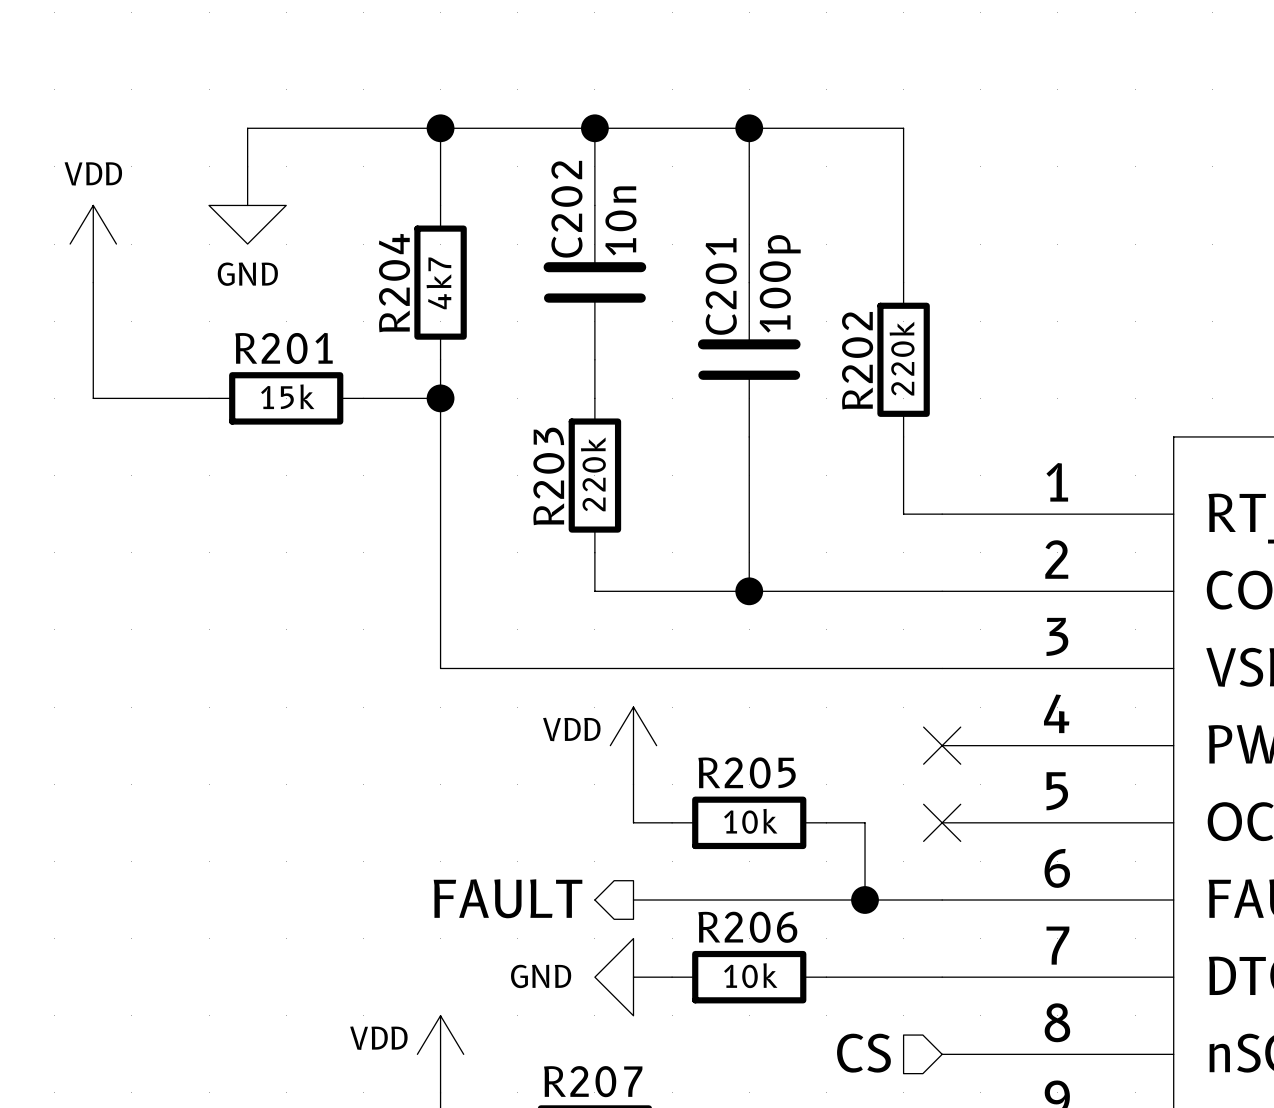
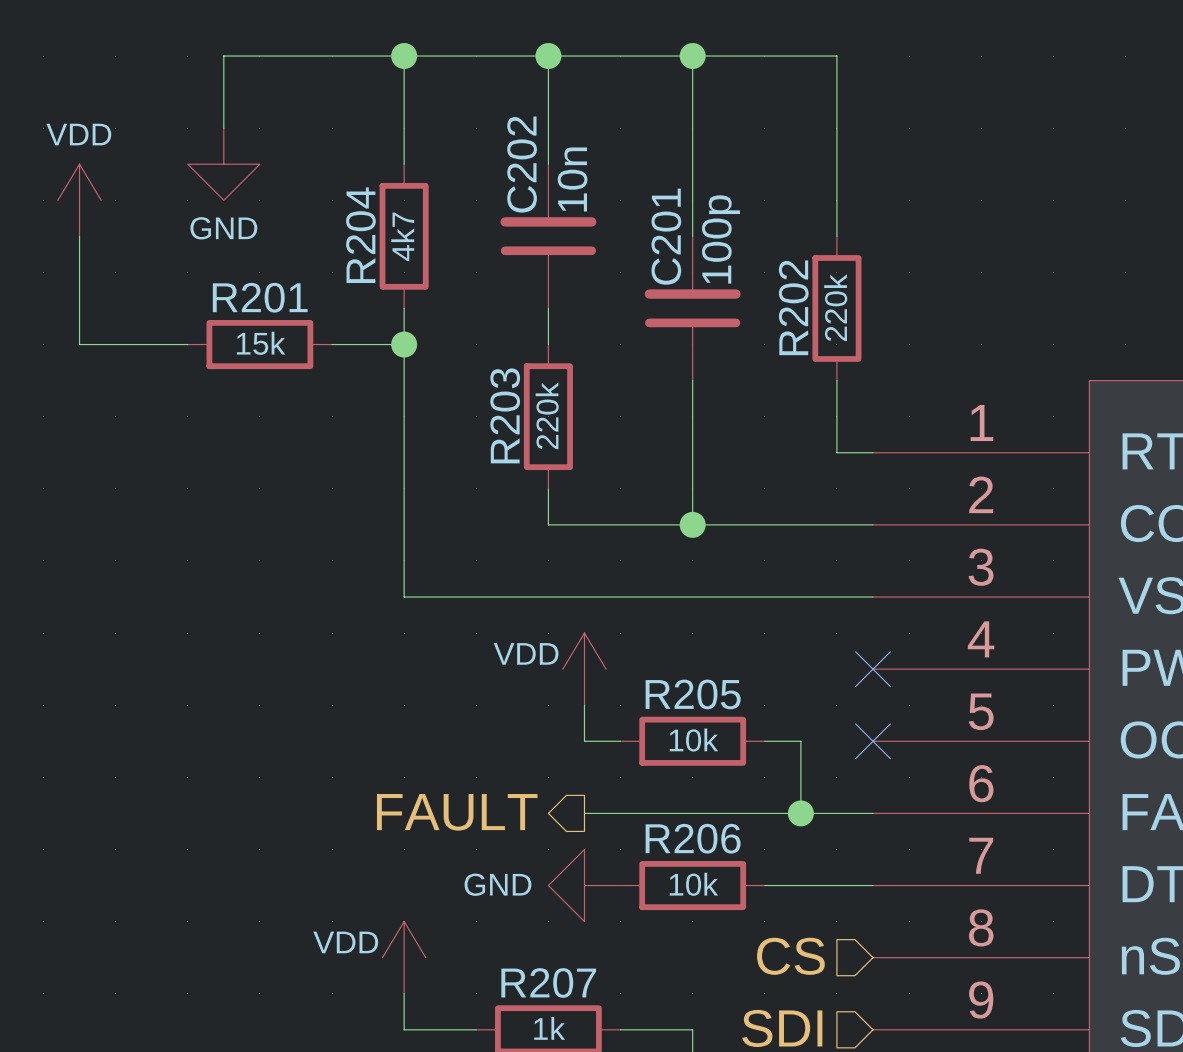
wire: none -> (404, 56) (404, 92)
wire: none -> (548, 56) (548, 92)
wire: none -> (692, 56) (692, 92)
wire: (247, 128) (903, 128) -> (223, 92) (223, 56) (836, 56) (836, 92)
junction position: (440, 128) -> (404, 56)
junction position: (594, 128) -> (548, 56)
junction position: (749, 128) -> (692, 56)

